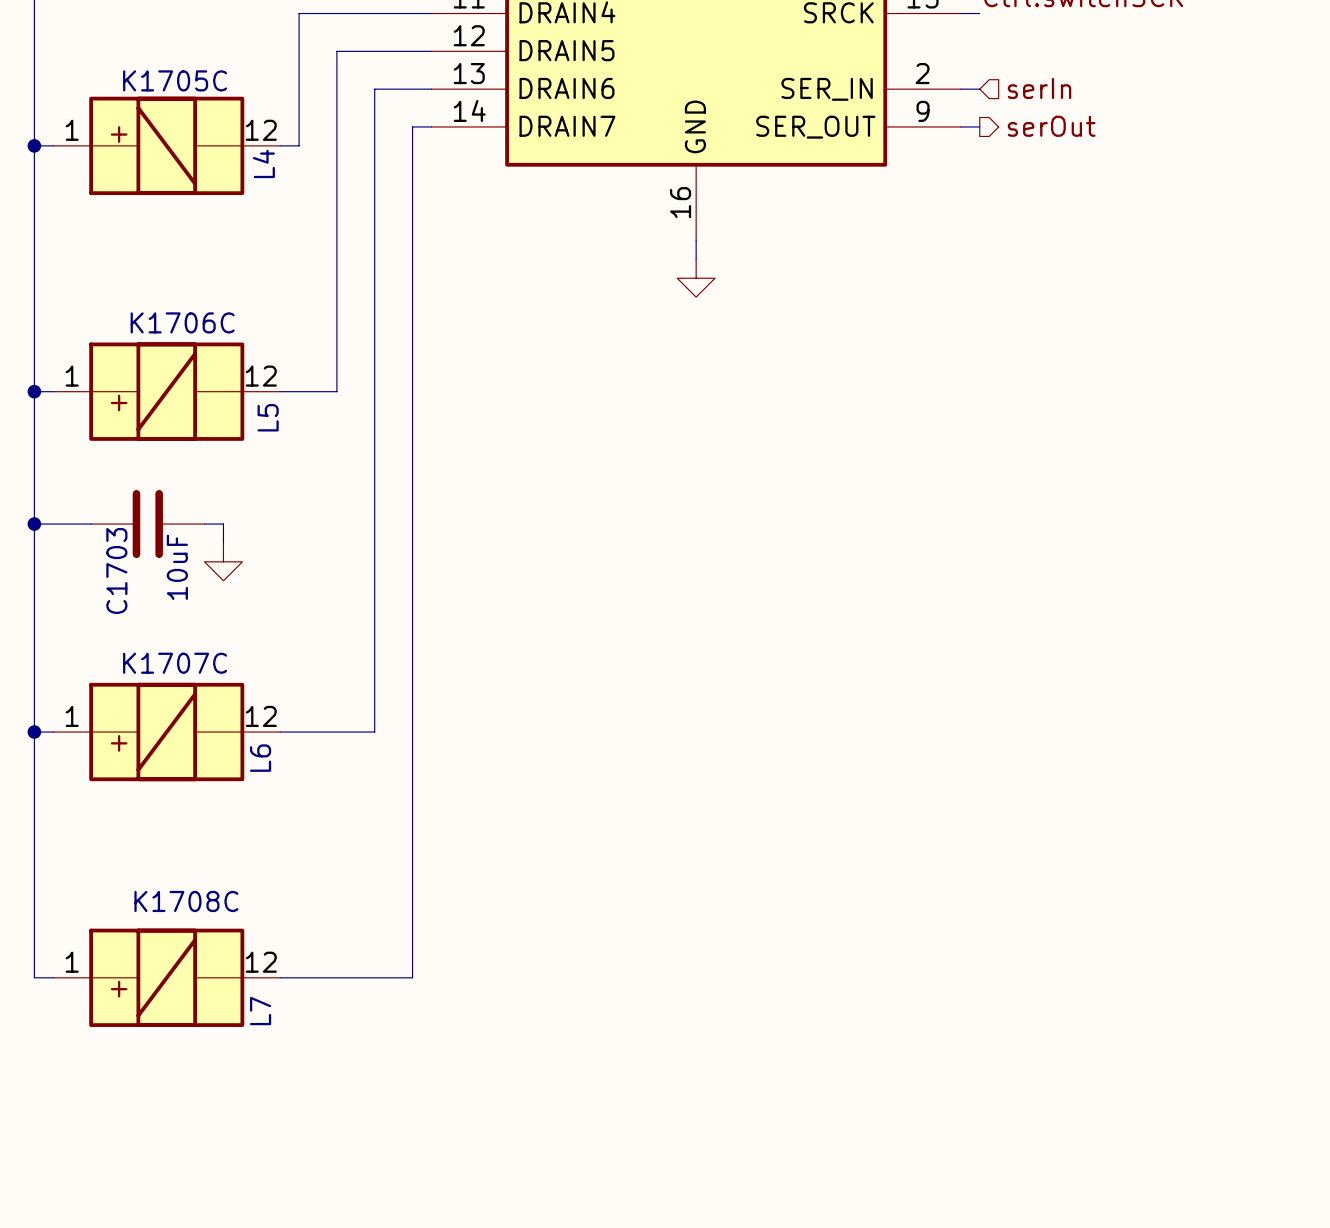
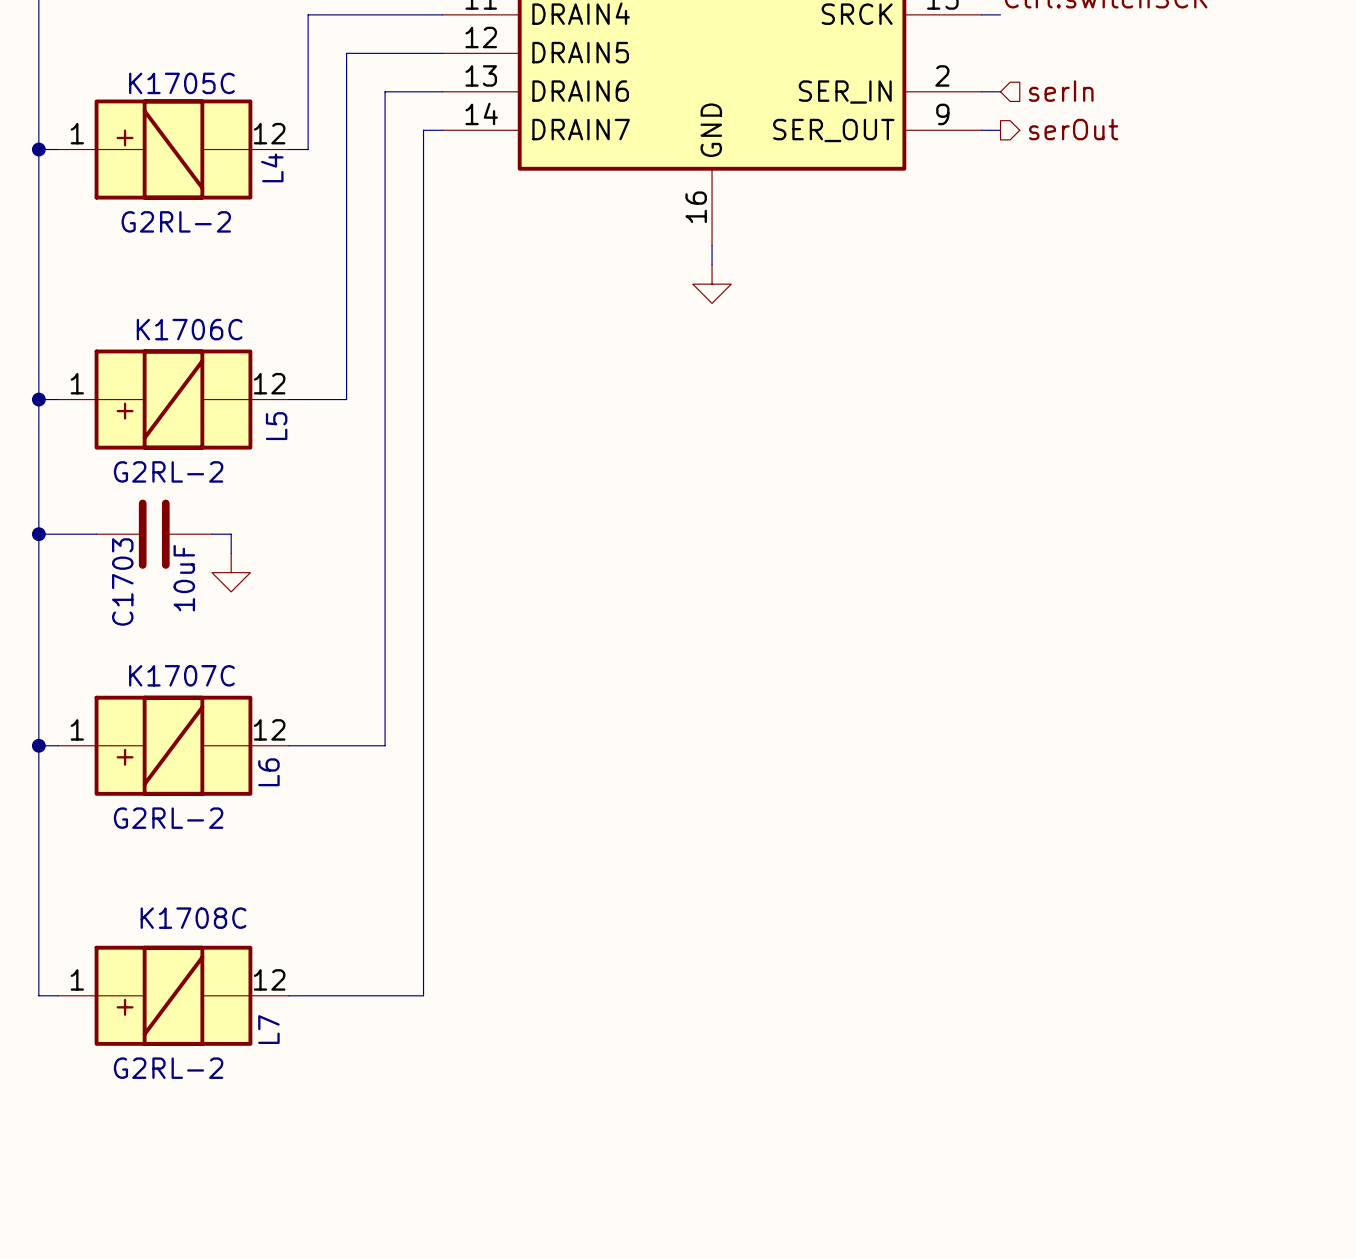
K1705C value: none -> G2RL-2 (176, 221)
K1706C value: none -> G2RL-2 (168, 471)
K1707C value: none -> G2RL-2 (168, 818)
K1708C value: none -> G2RL-2 (168, 1068)

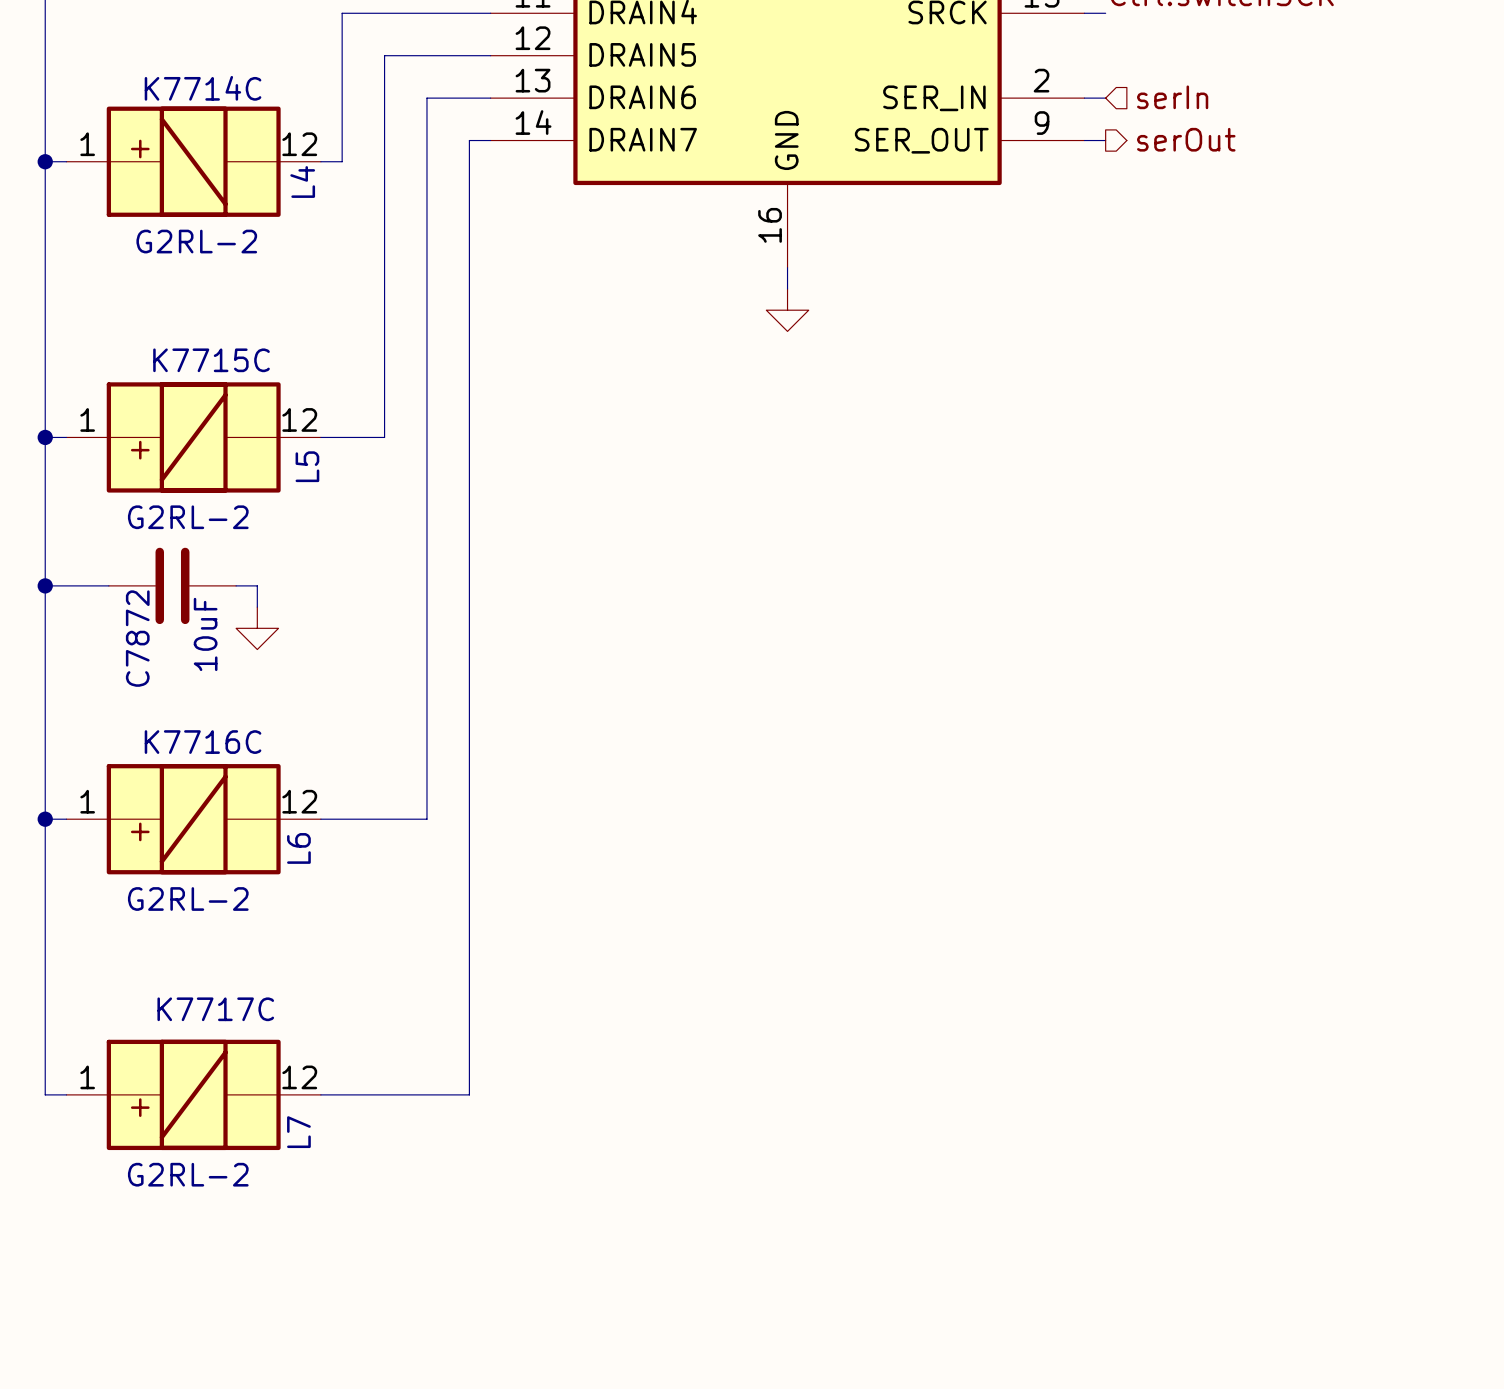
K1705C name: K1705C (181, 83) -> K7714C (203, 88)
K1706C name: K1706C (189, 329) -> K7715C (211, 360)
C1703 name: C1703 (122, 581) -> C7872 (137, 638)
K1707C name: K1707C (181, 675) -> K7716C (203, 742)
K1708C name: K1708C (193, 918) -> K7717C (215, 1009)

